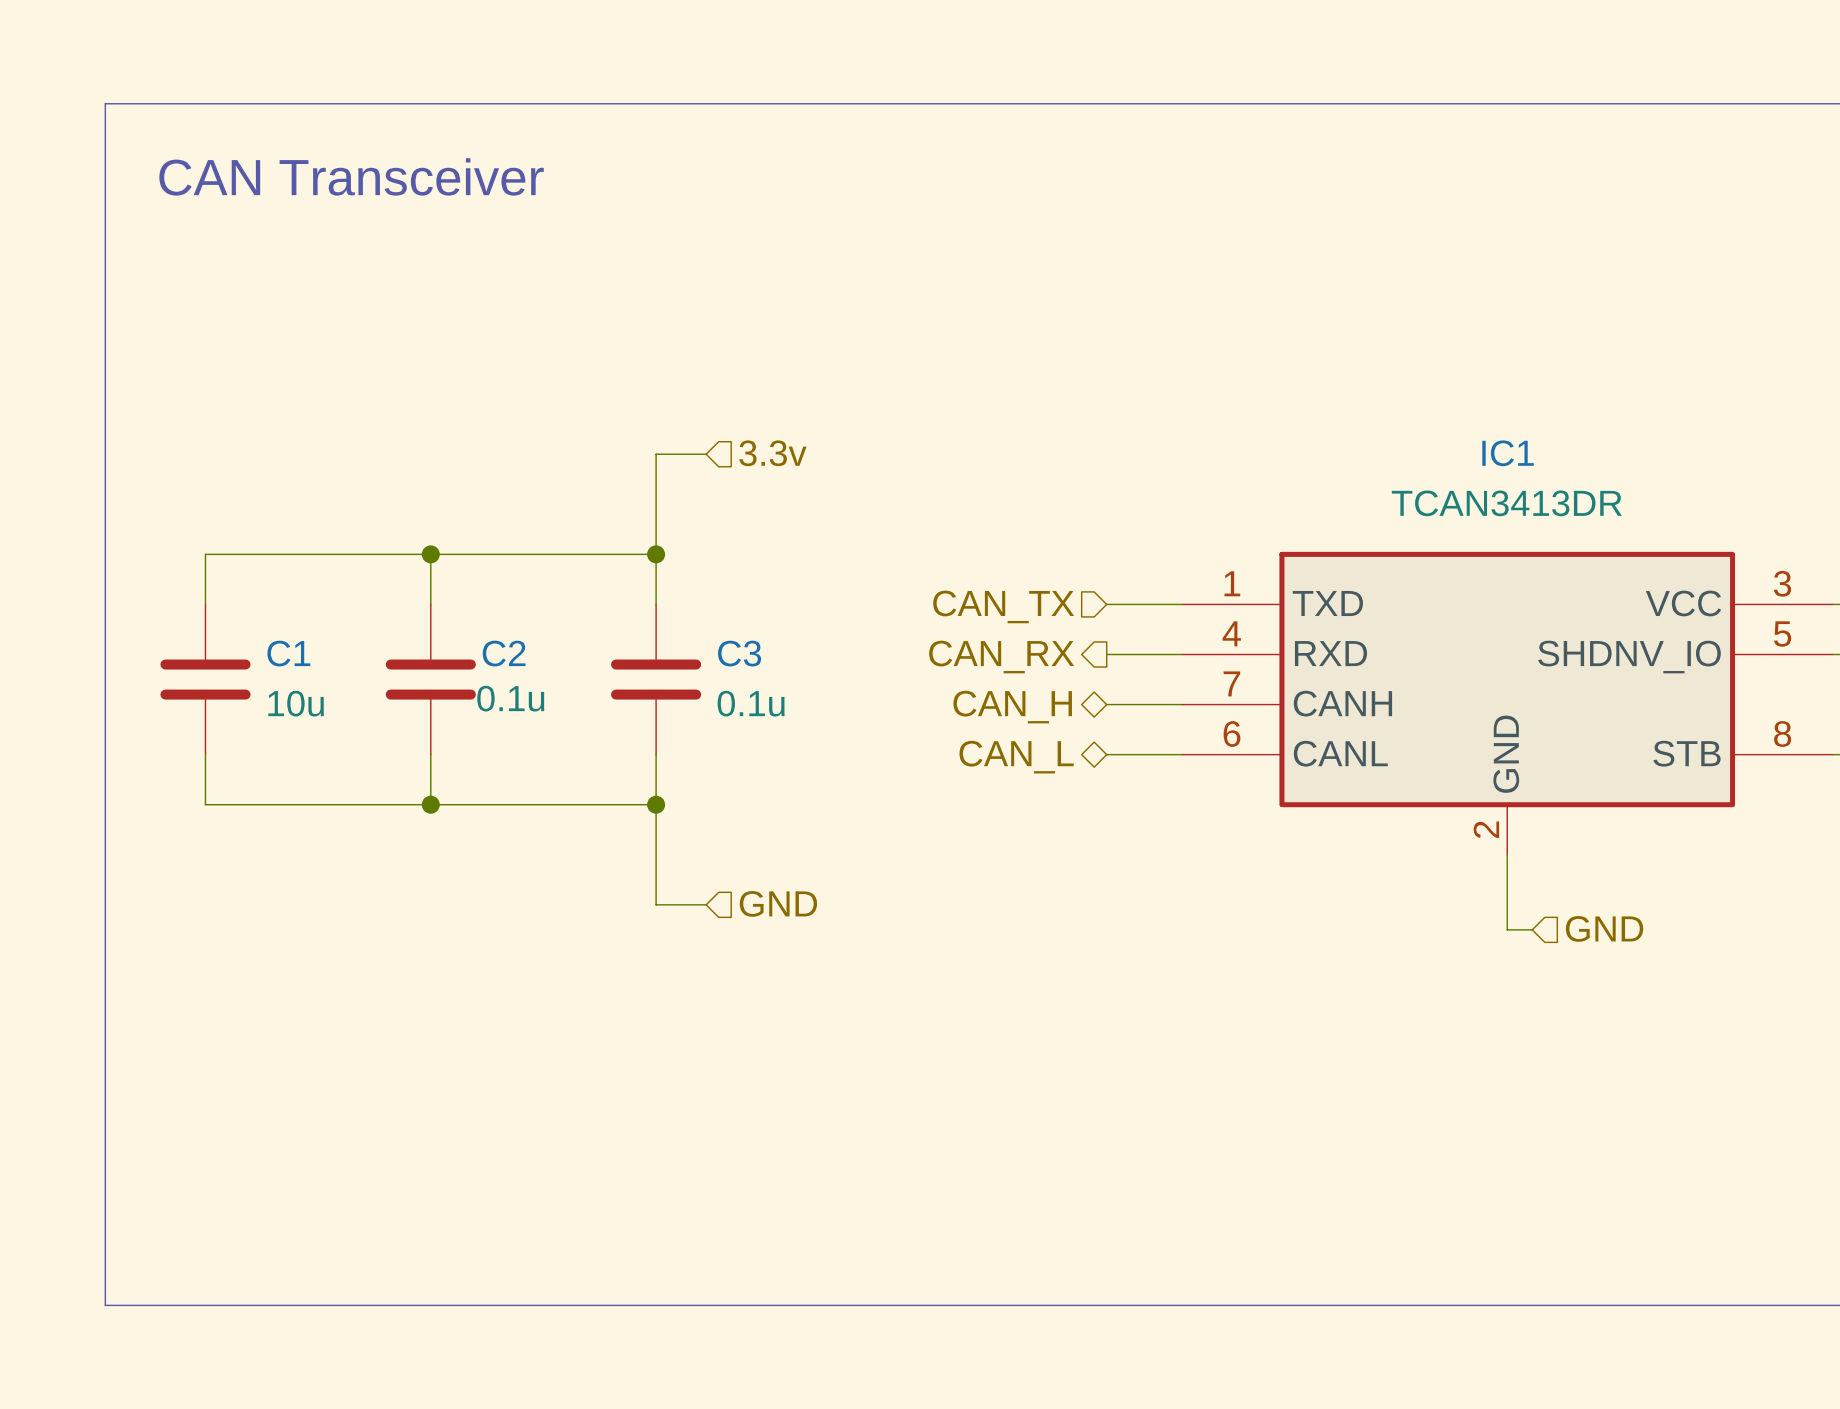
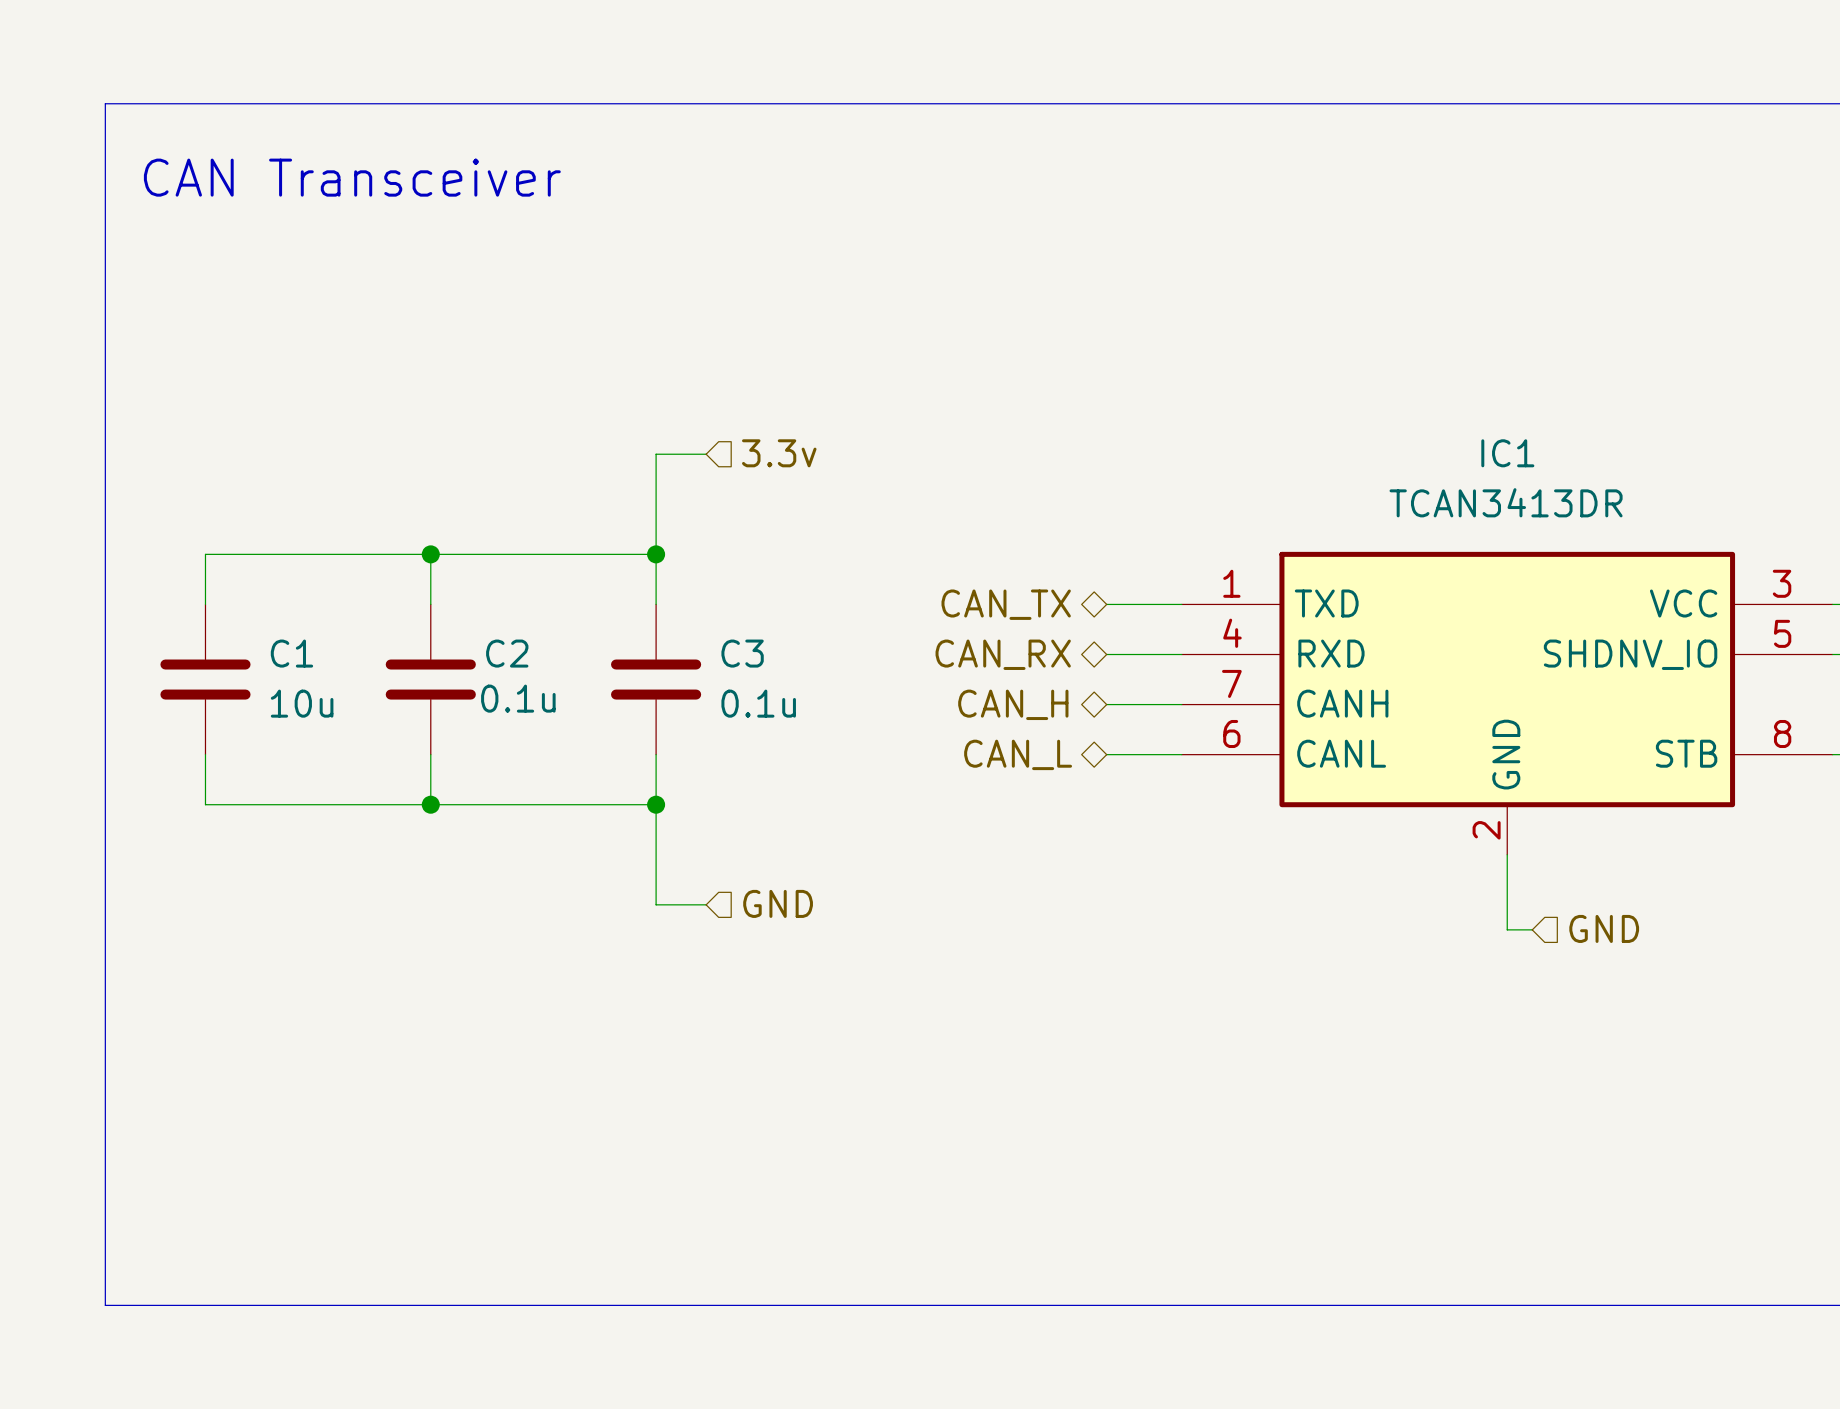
hierarchical label shape: input (1003, 606) -> bidirectional (1006, 604)
hierarchical label shape: output (1001, 657) -> bidirectional (1003, 654)

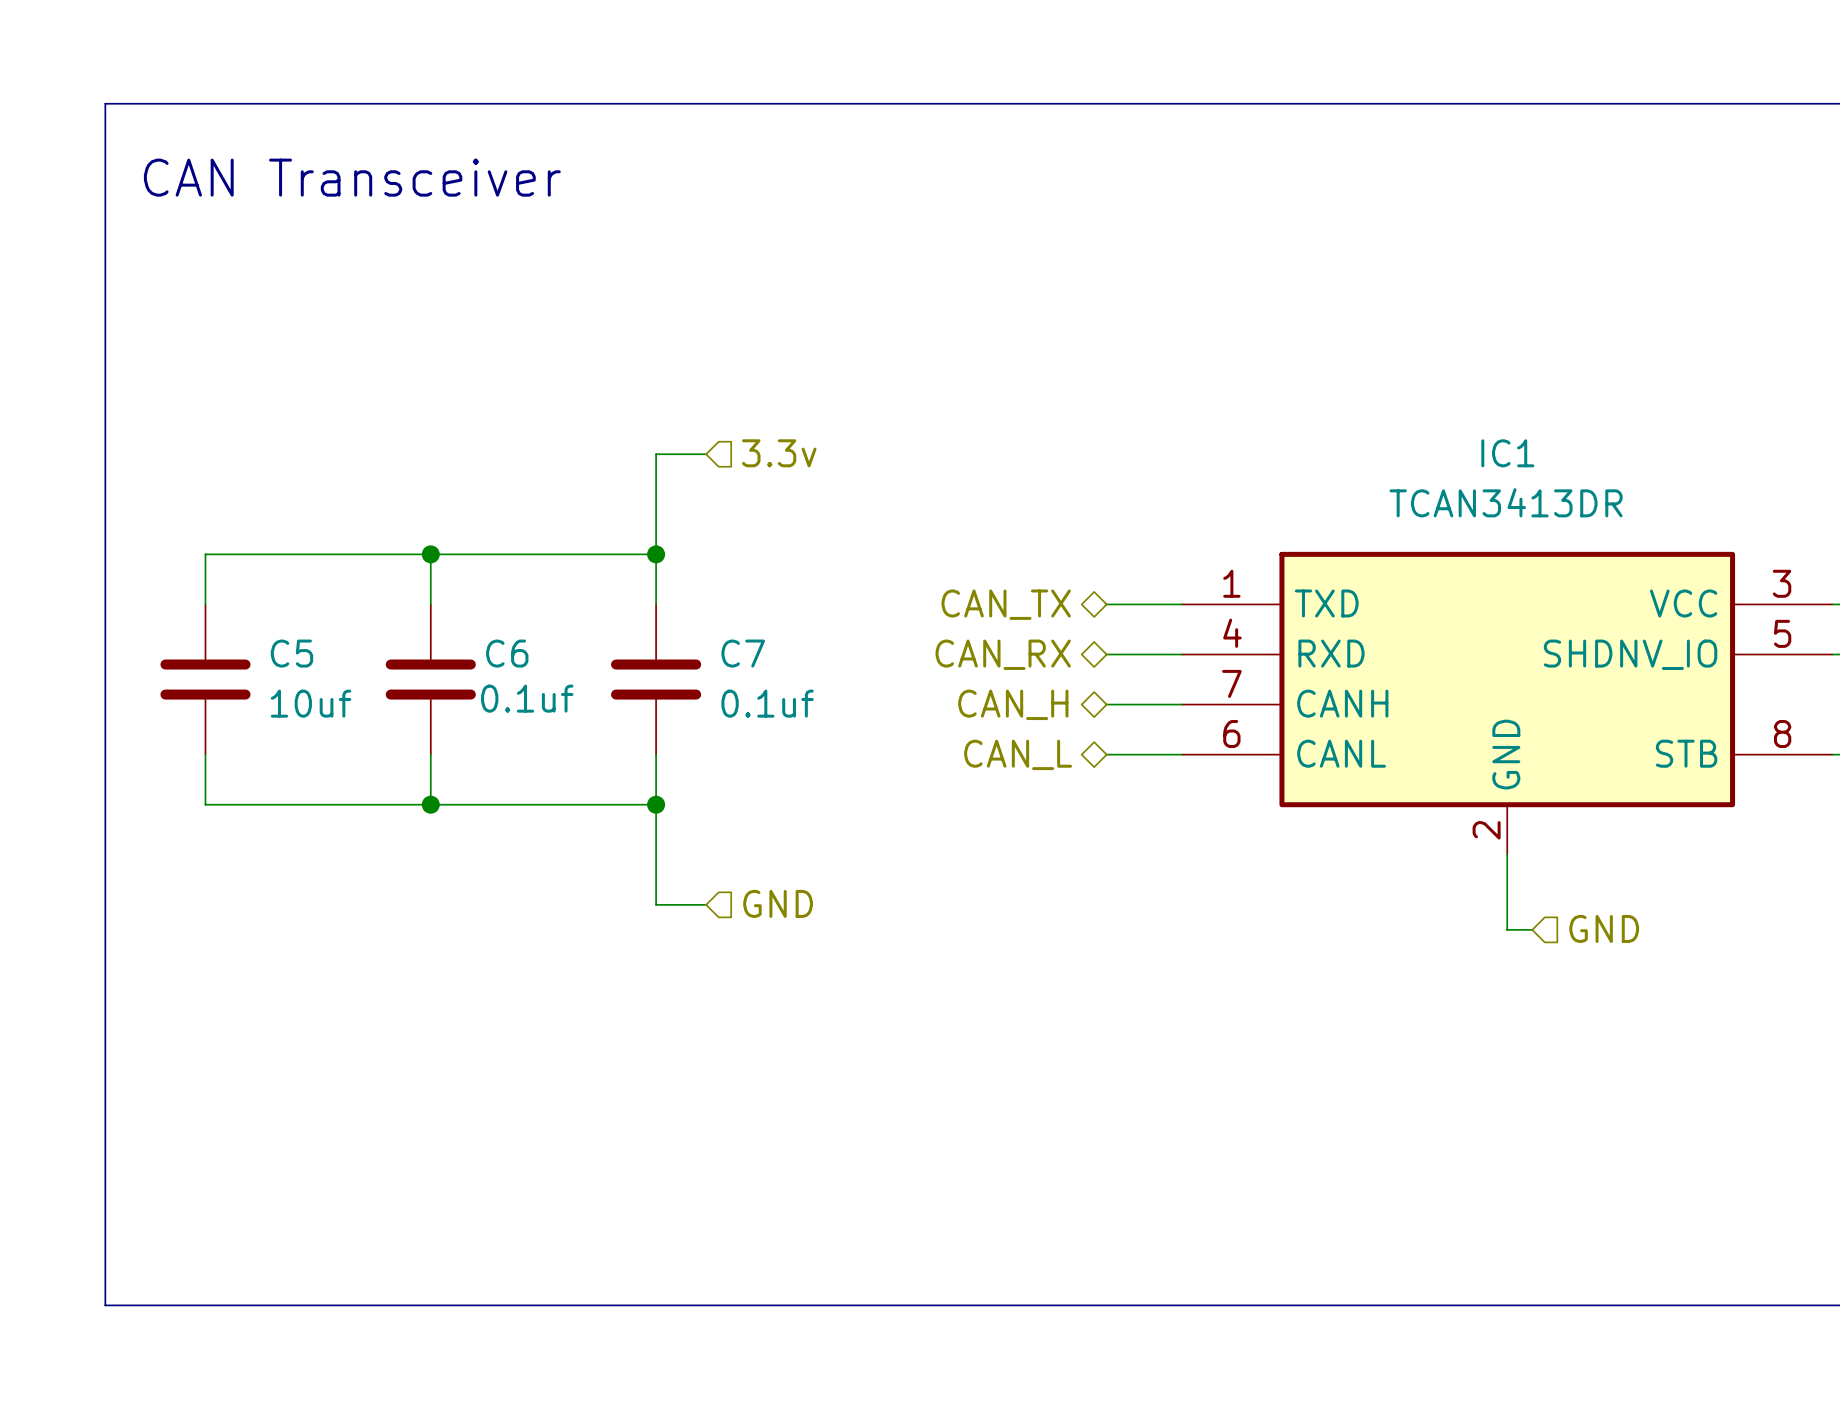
C1 name: C1 (291, 653) -> C5 (291, 653)
C2 name: C2 (507, 653) -> C6 (507, 653)
C3 name: C3 (742, 653) -> C7 (743, 653)
C2 value: 0.1u (518, 698) -> 0.1uf (527, 698)
C1 value: 10u (302, 703) -> 10uf (311, 703)
C3 value: 0.1u (758, 703) -> 0.1uf (767, 703)

